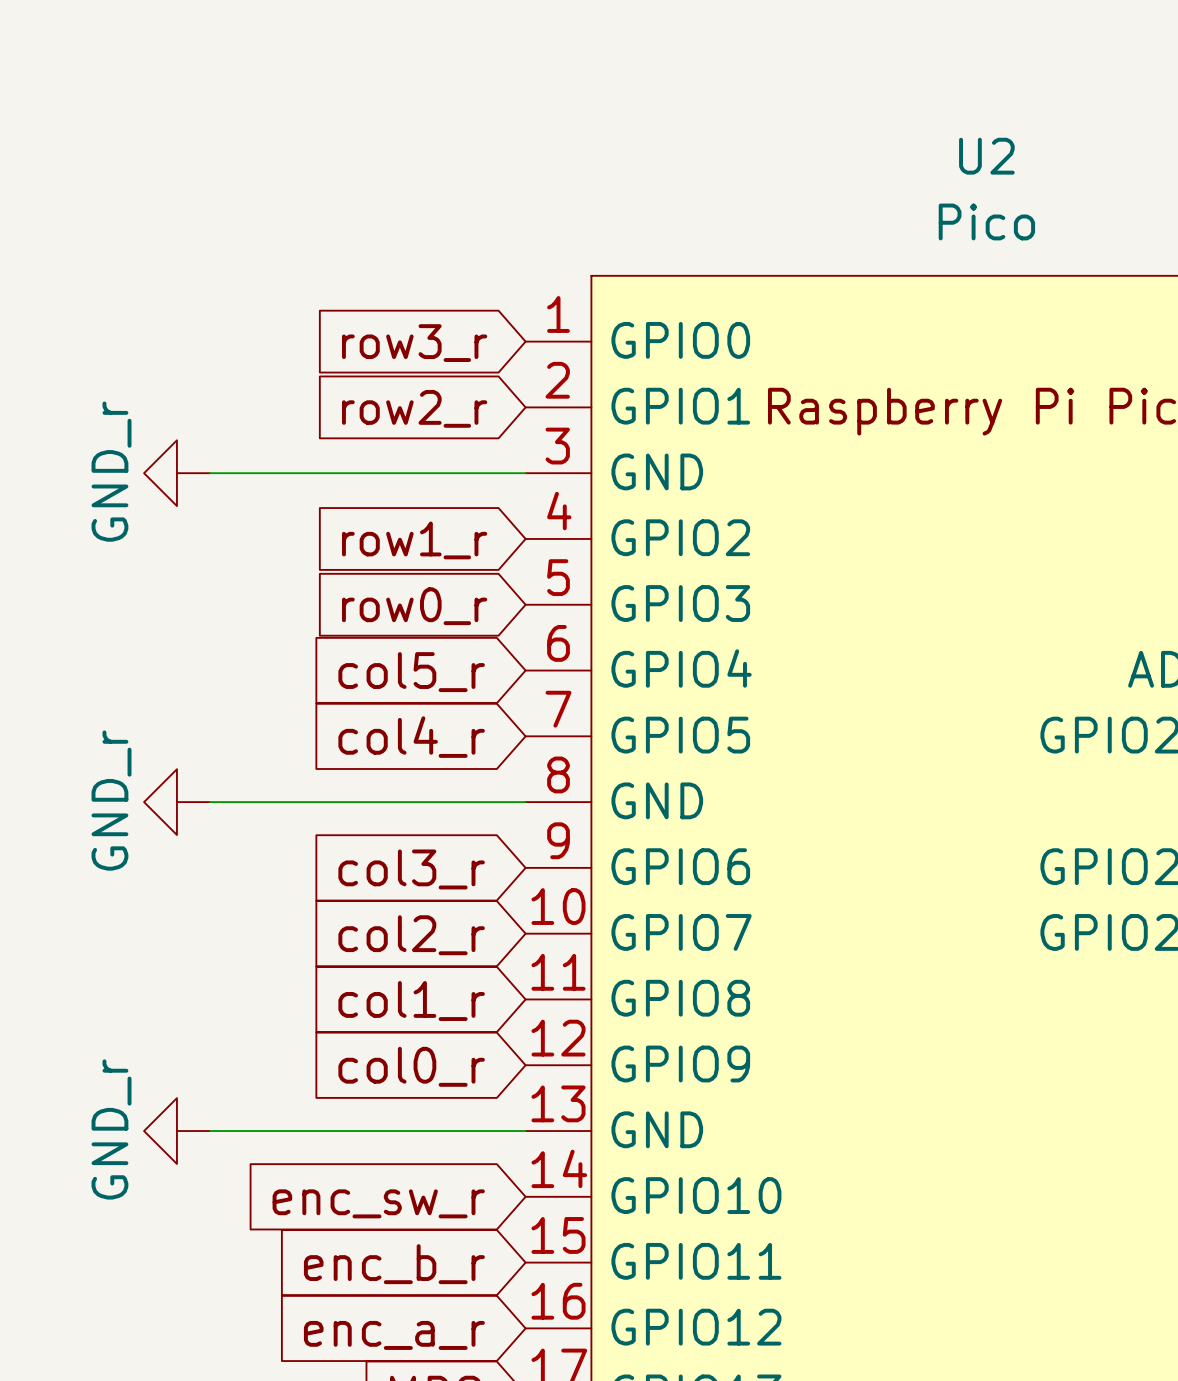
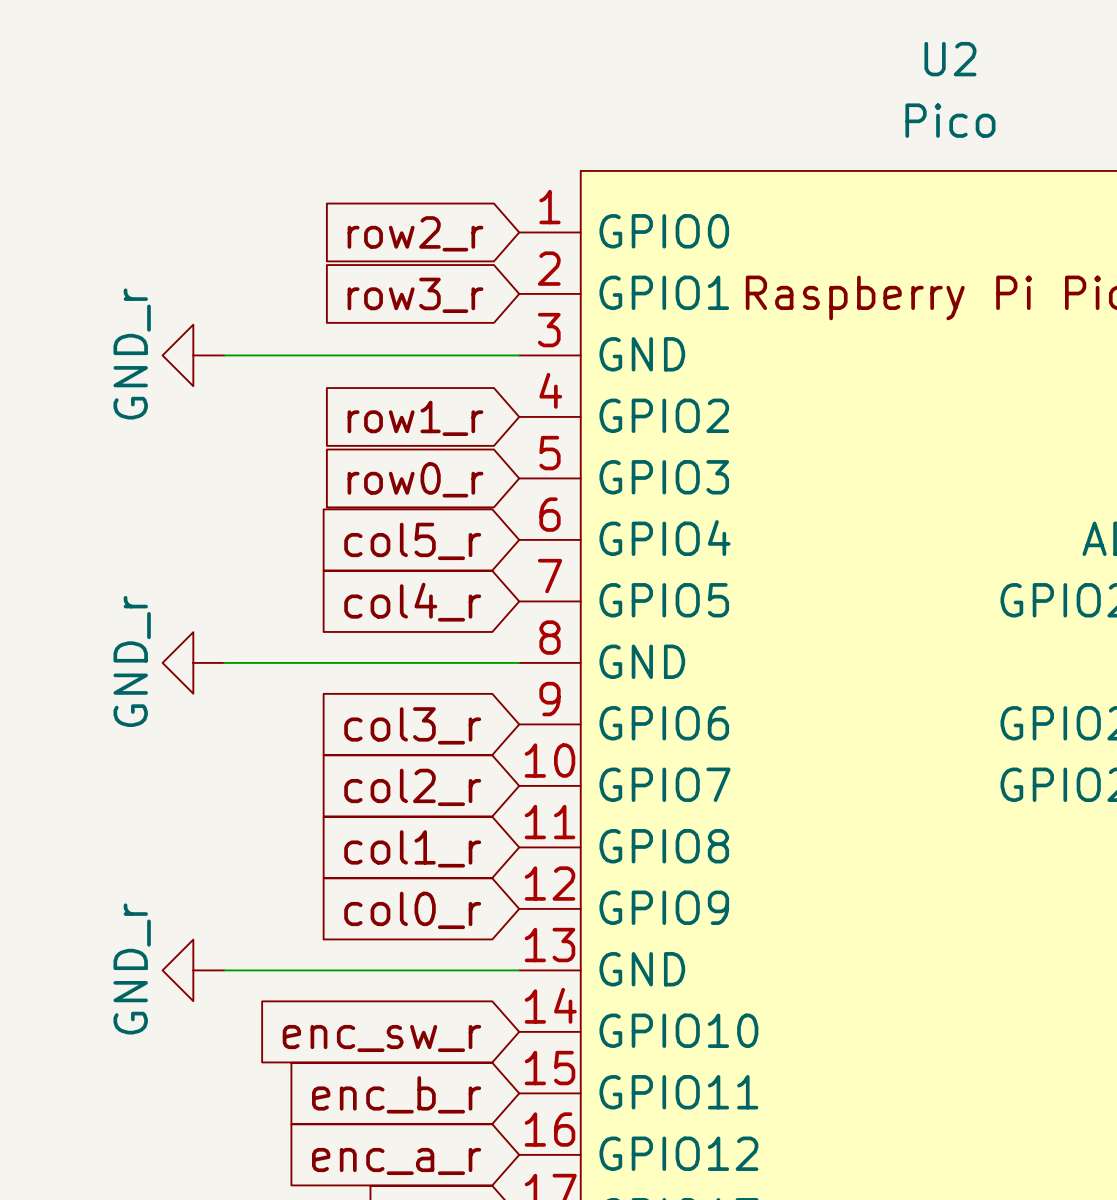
global label: row3_r (414, 343) -> row2_r (415, 233)
global label: row2_r (414, 408) -> row3_r (415, 295)

